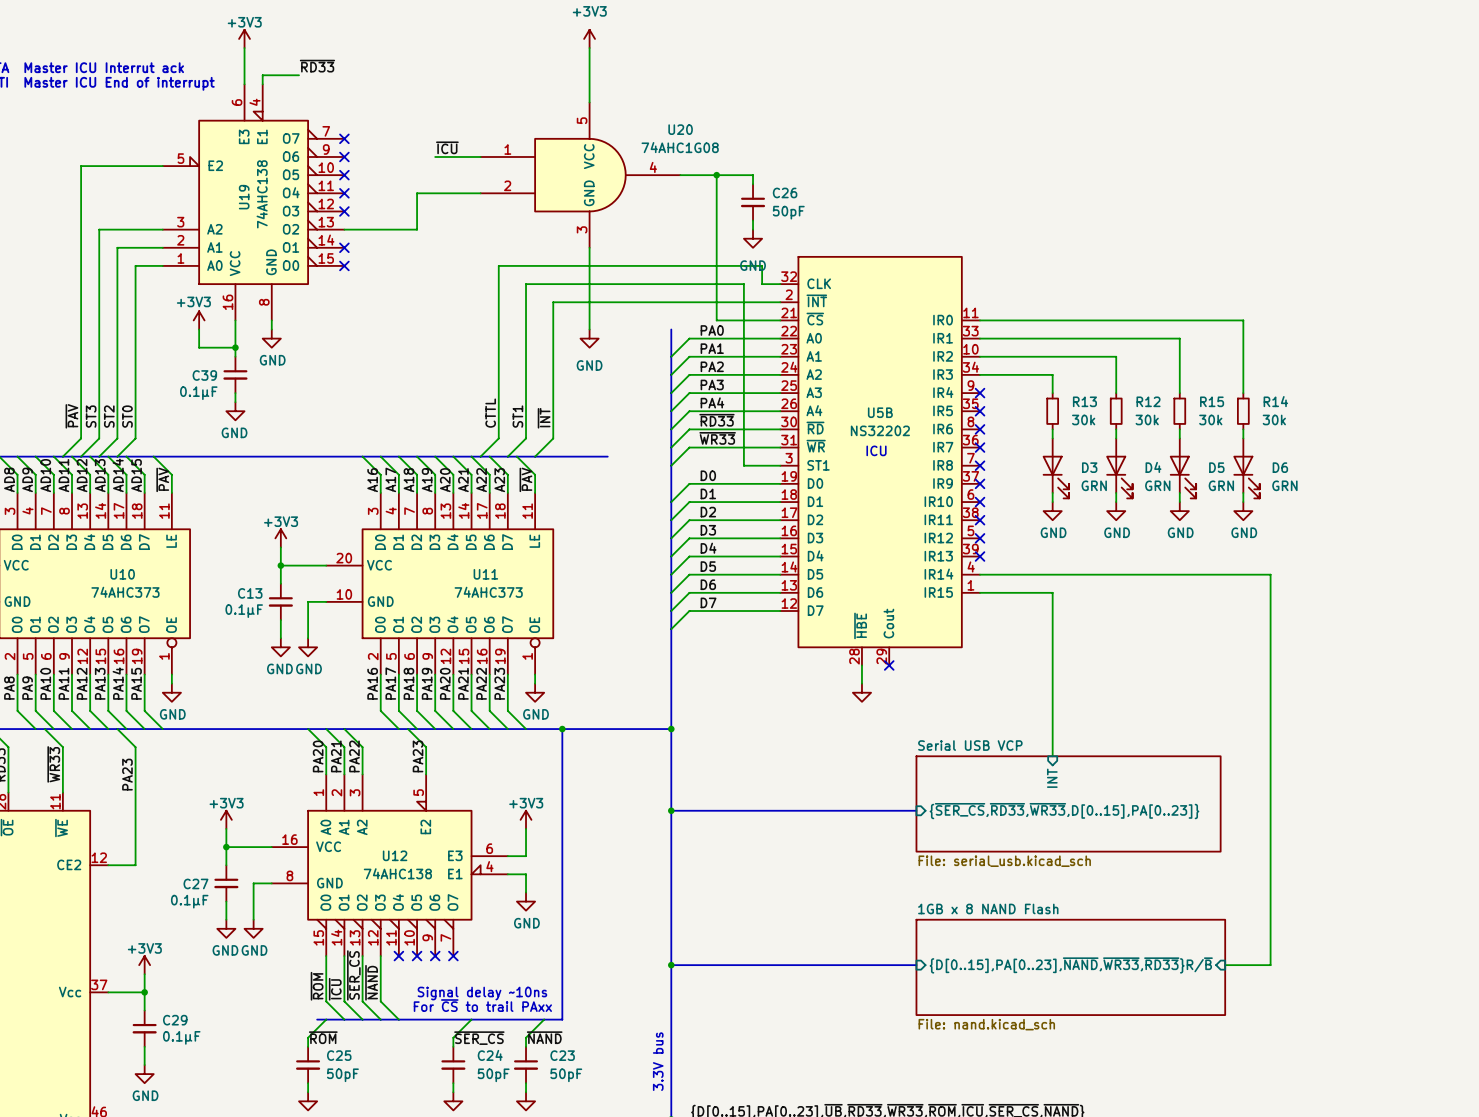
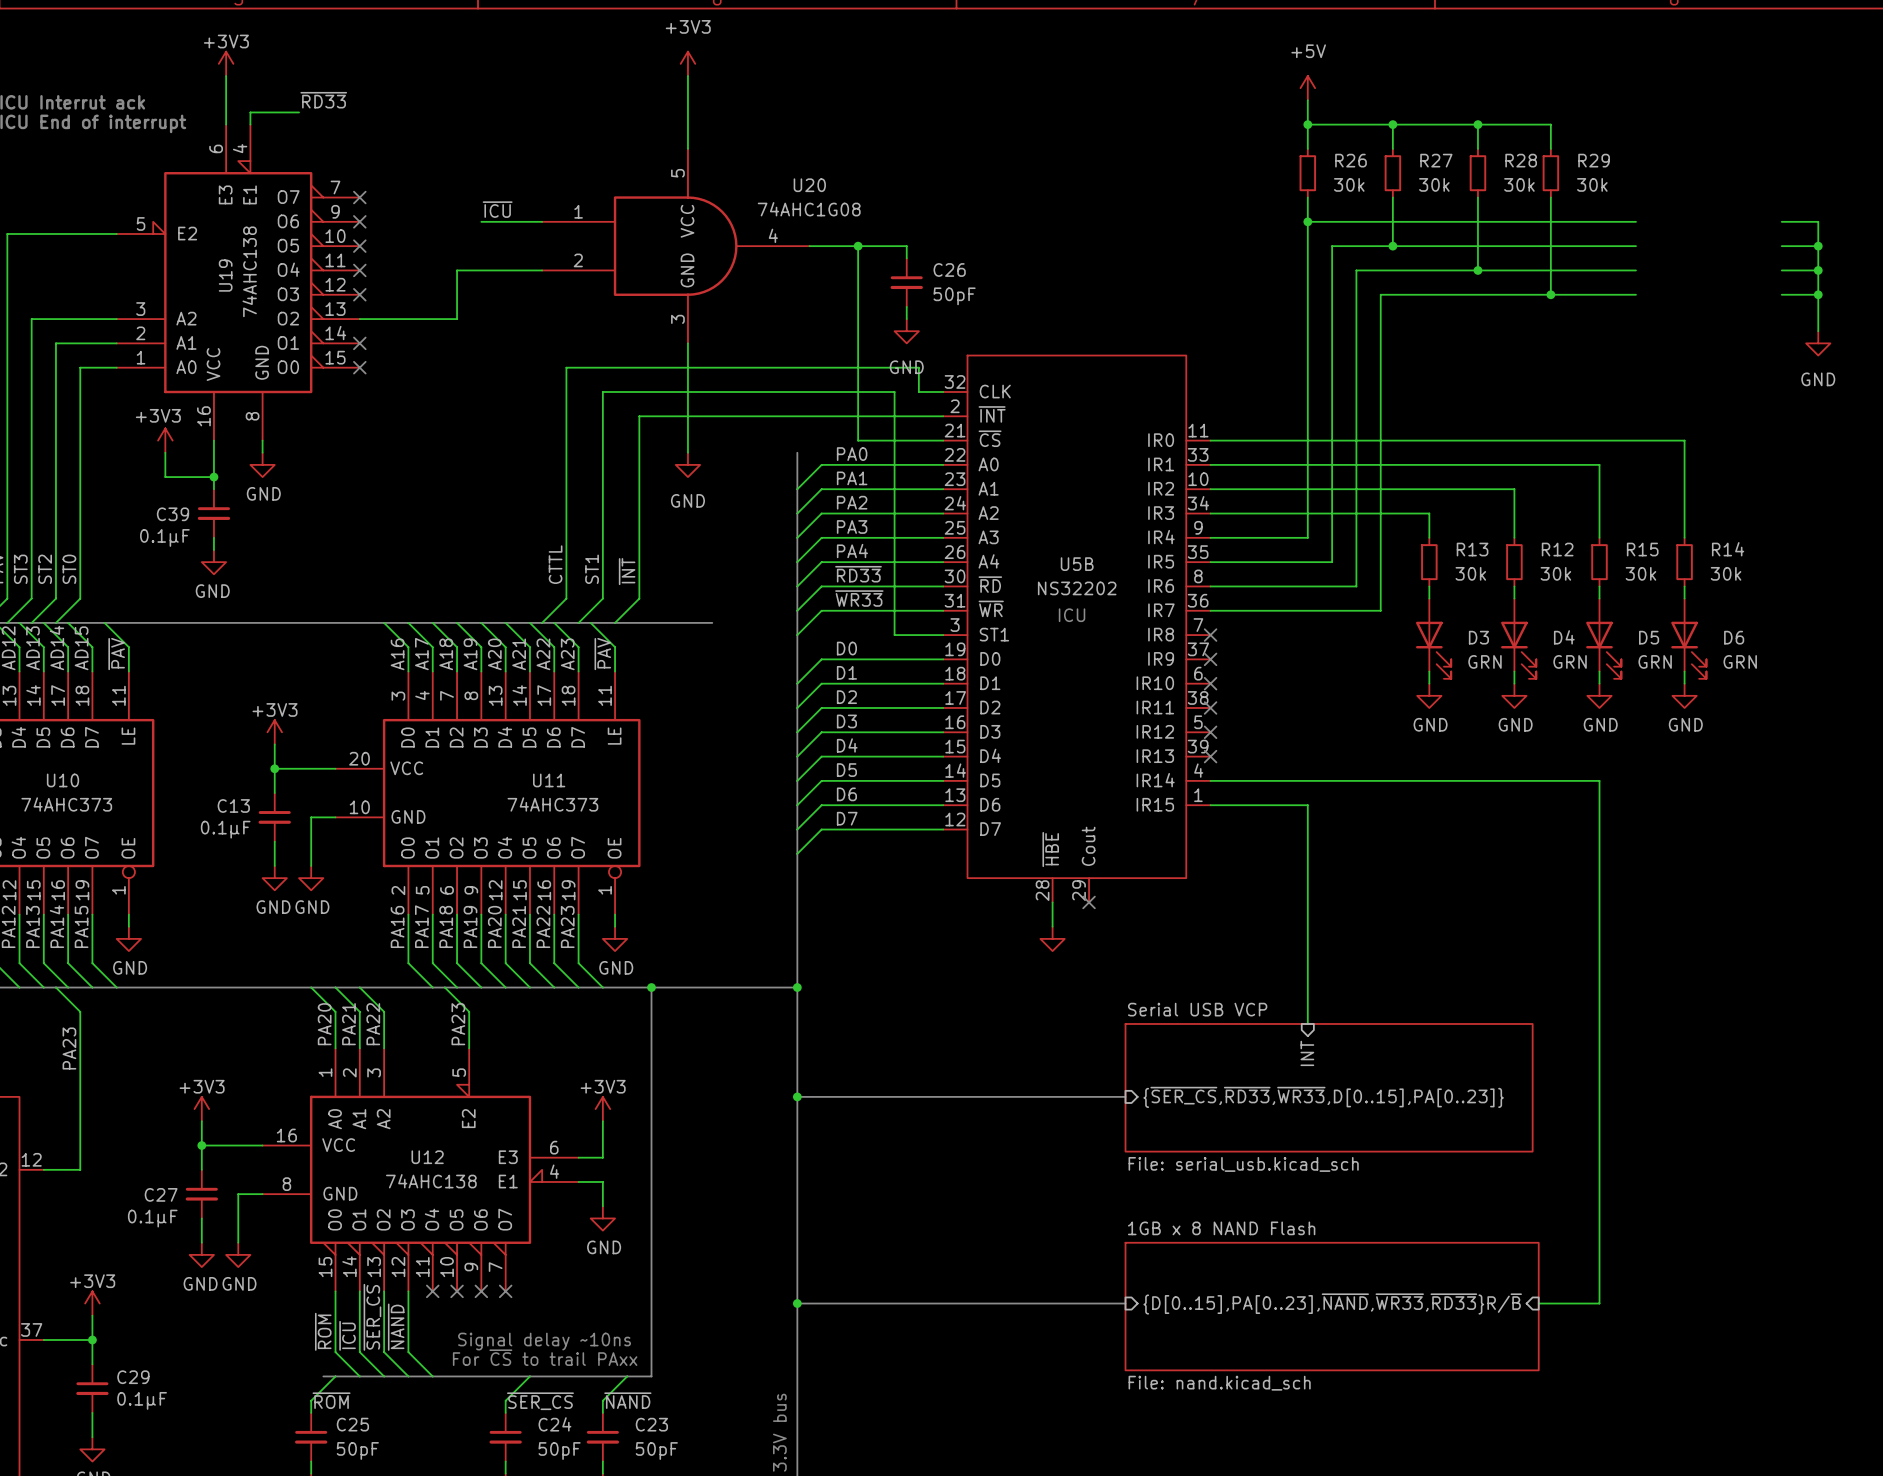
power symbol: none -> +5V (1307, 88)
wire: none -> (1307, 100) (1307, 148)
wire: none -> (1307, 124) (1550, 124) (1550, 148)
junction: none -> (1307, 124)
wire: none -> (1392, 124) (1392, 148)
junction: none -> (1392, 124)
wire: none -> (1477, 124) (1477, 148)
junction: none -> (1477, 124)
R26: none -> 30k (1307, 173)
R27: none -> 30k (1392, 173)
R28: none -> 30k (1477, 173)
R29: none -> 30k (1550, 173)
wire: none -> (1307, 197) (1307, 513) (1429, 513) (1429, 537)
wire: none -> (1392, 197) (1392, 246)
wire: none -> (1477, 197) (1477, 270)
wire: none -> (1550, 197) (1550, 294)
wire: none -> (1307, 221) (1635, 221)
junction: none -> (1307, 221)
wire: none -> (1781, 221) (1818, 221) (1818, 331)
junction: none -> (1392, 246)
wire: none -> (1635, 246) (1332, 246) (1332, 562) (1210, 562)
wire: none -> (1781, 246) (1818, 246)
junction: none -> (1818, 246)
junction: none -> (1477, 270)
wire: none -> (1635, 270) (1356, 270) (1356, 586) (1210, 586)
wire: none -> (1781, 270) (1818, 270)
junction: none -> (1818, 270)
junction: none -> (1550, 294)
wire: none -> (1635, 294) (1380, 294) (1380, 610) (1210, 610)
wire: none -> (1781, 294) (1818, 294)
junction: none -> (1818, 294)
power symbol: none -> GND (1818, 343)
wire: (1243, 320) (1243, 393) -> (1563, 440) (1684, 440) (1684, 537)
wire: (1179, 338) (1179, 393) -> (1477, 464) (1599, 464) (1599, 537)
wire: (1116, 356) (1116, 393) -> (1392, 489) (1514, 489) (1514, 537)
wire: none -> (1210, 537) (1307, 537)
no-connect mark: (980, 393) -> none
no-connect mark: (980, 411) -> none
R13 position: (1052, 411) -> (1429, 562)
R12 position: (1116, 411) -> (1514, 562)
R15 position: (1179, 411) -> (1599, 562)
R14 position: (1243, 411) -> (1684, 562)
no-connect mark: (980, 429) -> none
wire: (1052, 429) (1052, 438) -> (1429, 586) (1429, 598)
wire: (1116, 429) (1116, 438) -> (1514, 586) (1514, 598)
wire: (1179, 429) (1179, 438) -> (1599, 586) (1599, 598)
wire: (1243, 429) (1243, 438) -> (1684, 586) (1684, 598)
no-connect mark: (980, 447) -> none
D3 position: (1055, 468) -> (1433, 638)
D4 position: (1119, 468) -> (1518, 638)
D5 position: (1182, 468) -> (1603, 638)
D6 position: (1246, 468) -> (1688, 638)
wire: (1052, 492) (1052, 502) -> (1429, 671) (1429, 683)
wire: (1116, 492) (1116, 502) -> (1514, 671) (1514, 683)
wire: (1179, 492) (1179, 502) -> (1599, 671) (1599, 683)
wire: (1243, 492) (1243, 502) -> (1684, 671) (1684, 683)
power symbol: GND (1052, 511) -> none
power symbol: GND (1116, 511) -> none
power symbol: none -> GND (1429, 695)
power symbol: GND (1179, 511) -> none
power symbol: none -> GND (1514, 695)
power symbol: GND (1243, 511) -> none
power symbol: none -> GND (1599, 695)
power symbol: none -> GND (1684, 695)

